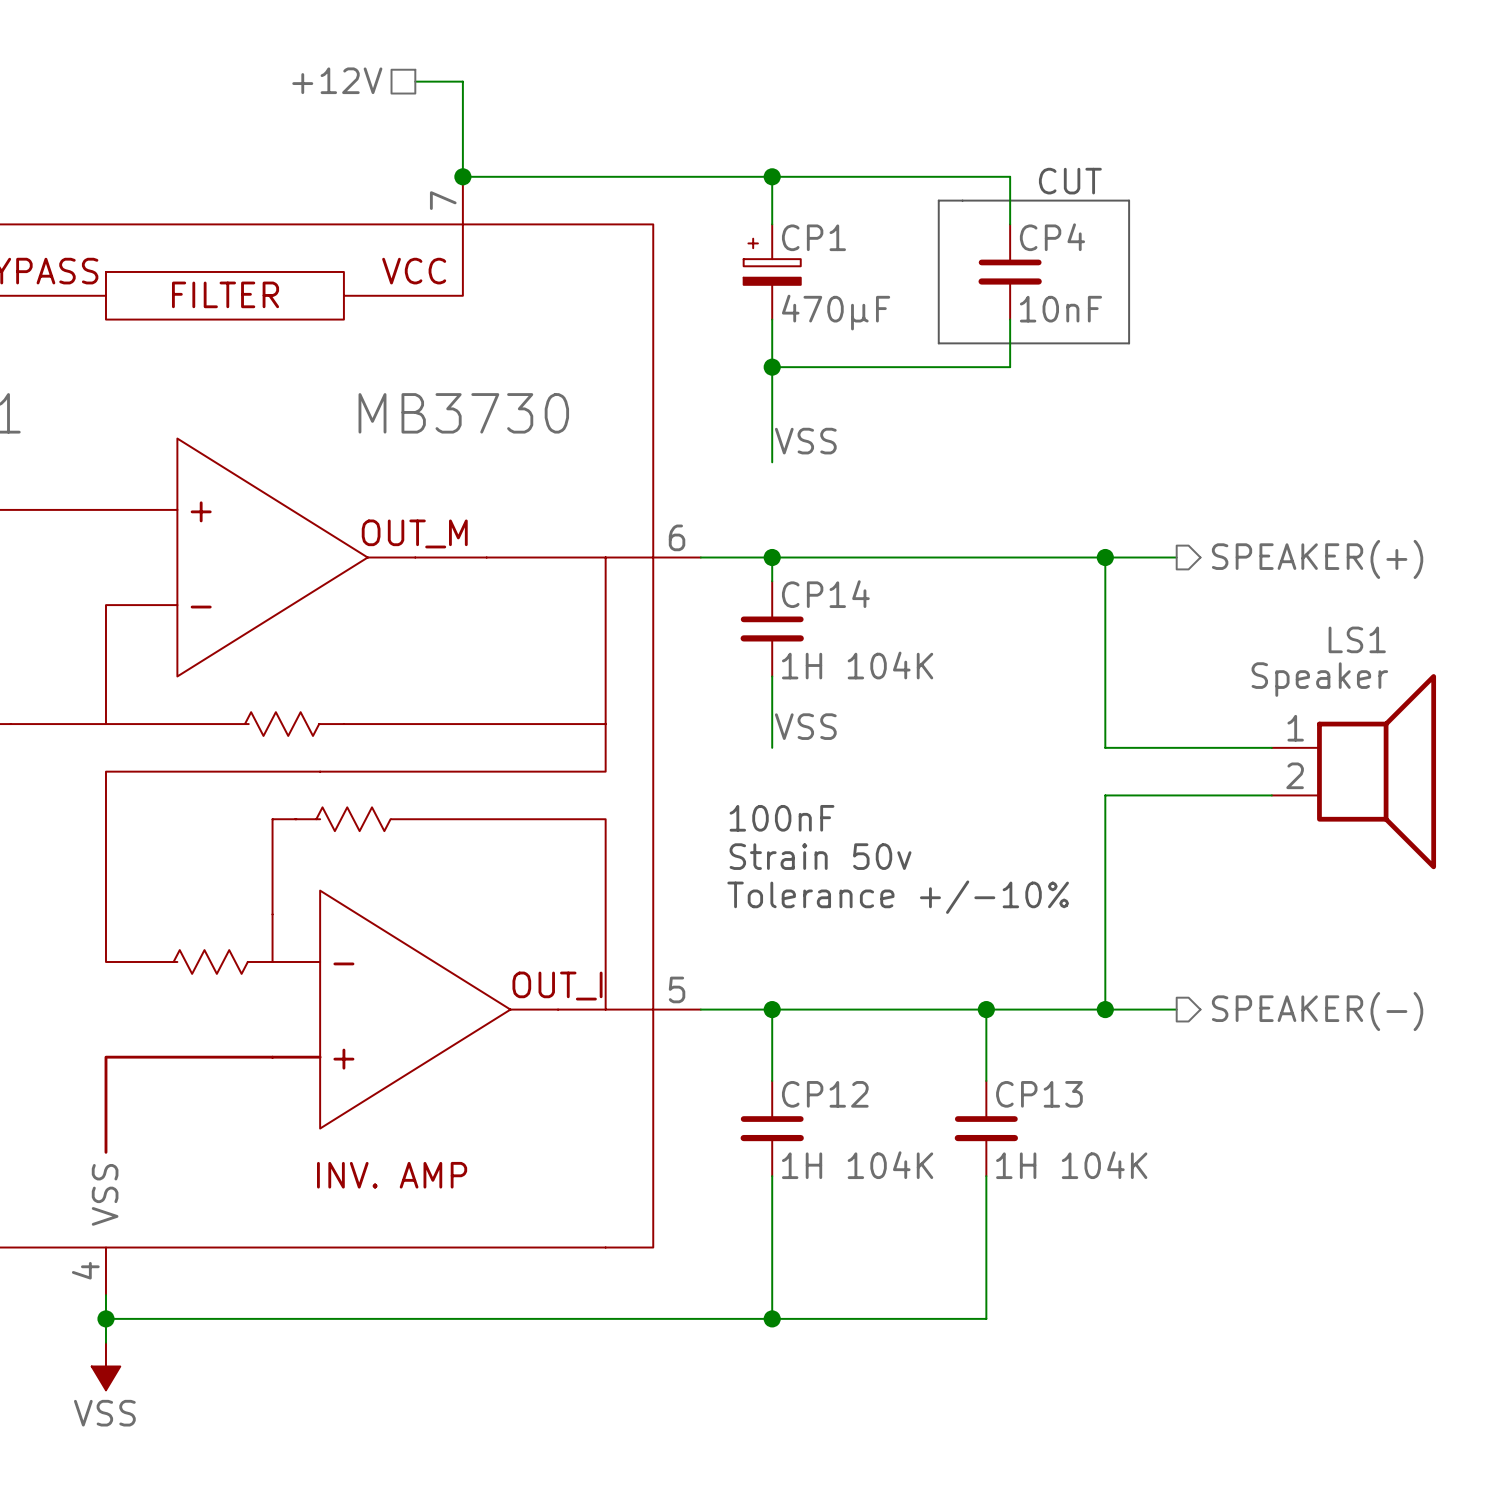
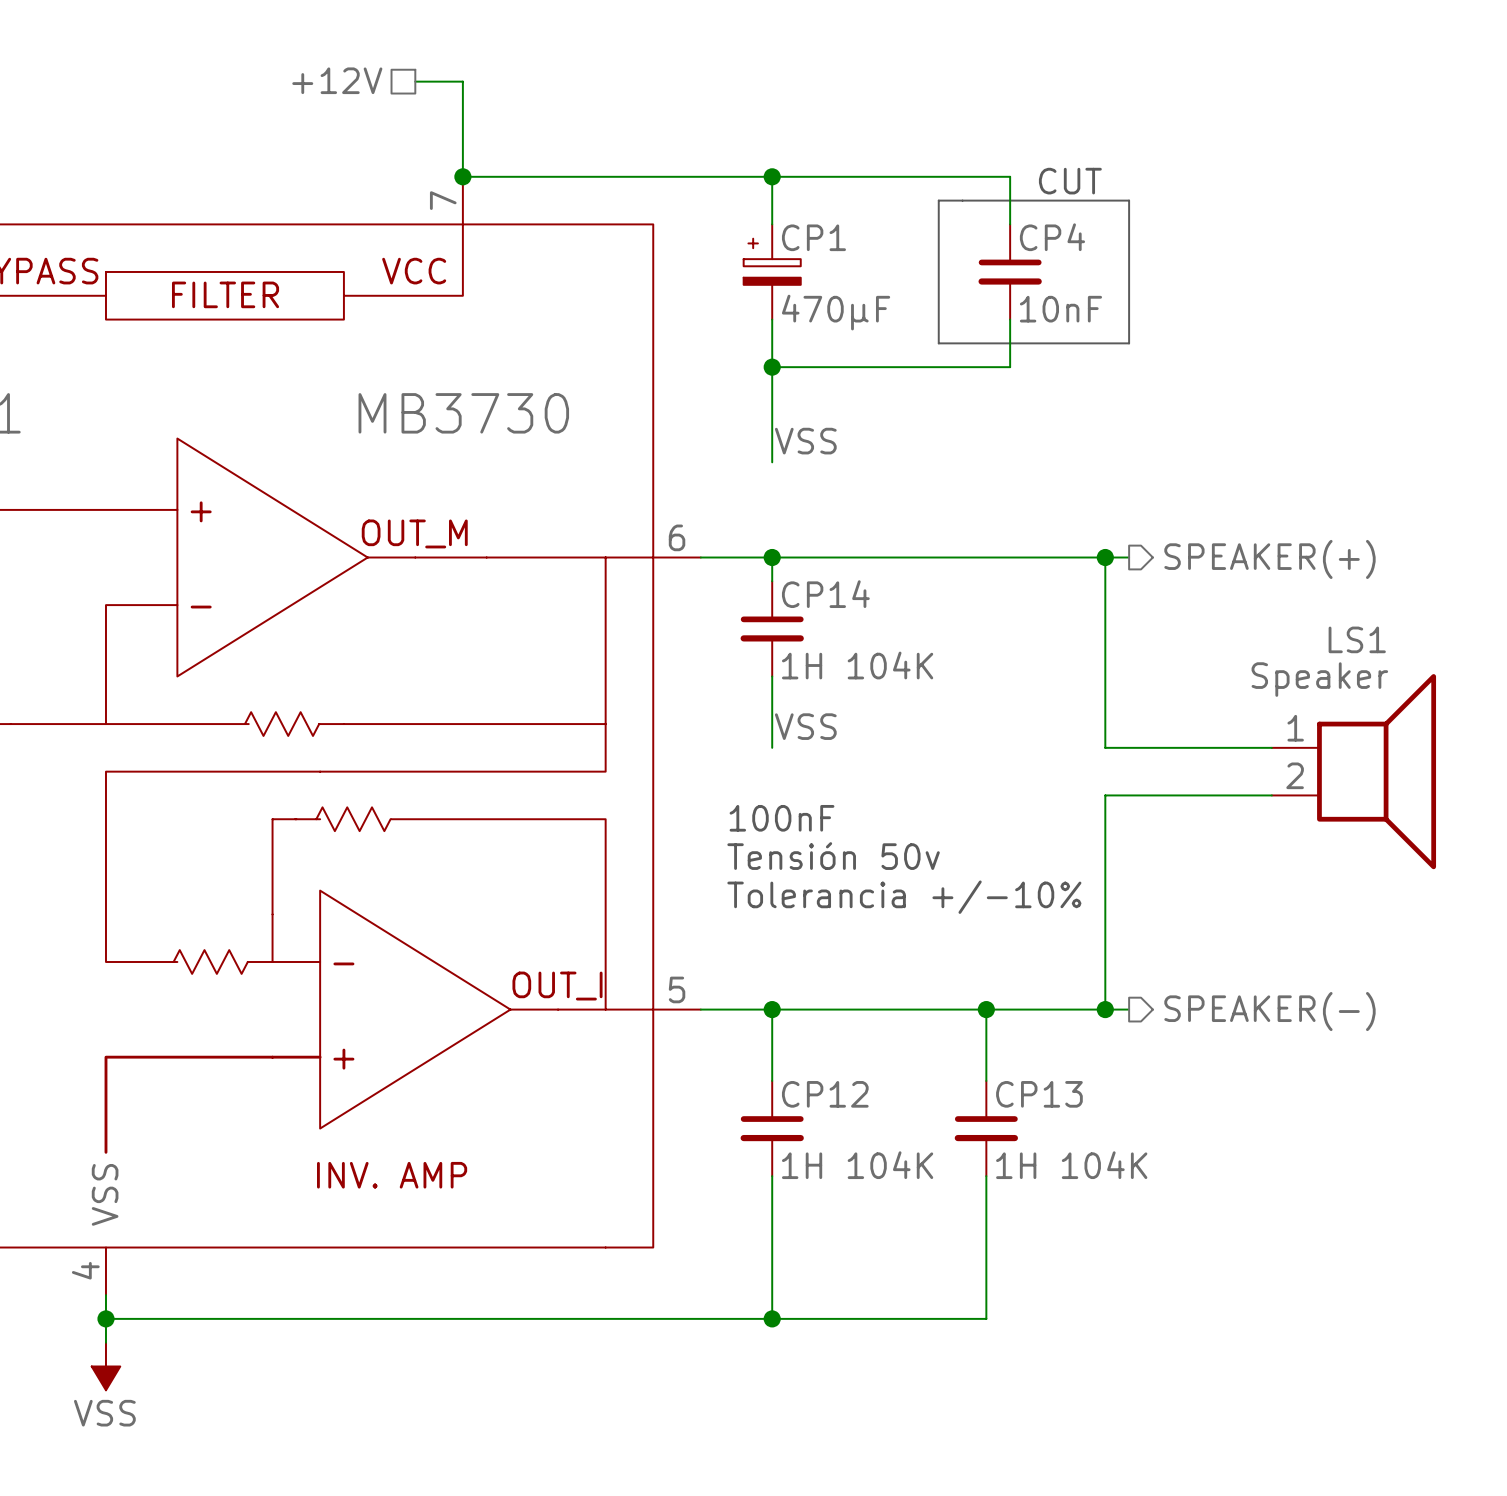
wire: (1129, 557) (1176, 557) -> none
hierarchical label position: SPEAKER(+) (1317, 559) -> SPEAKER(+) (1269, 559)
text: Strain 50v (820, 856) -> Tensión 50v (833, 856)
text: Tolerance +/-10% (898, 897) -> Tolerancia +/-10% (904, 897)
wire: (1129, 1009) (1176, 1009) -> none
hierarchical label position: SPEAKER(-) (1317, 1011) -> SPEAKER(-) (1269, 1011)

